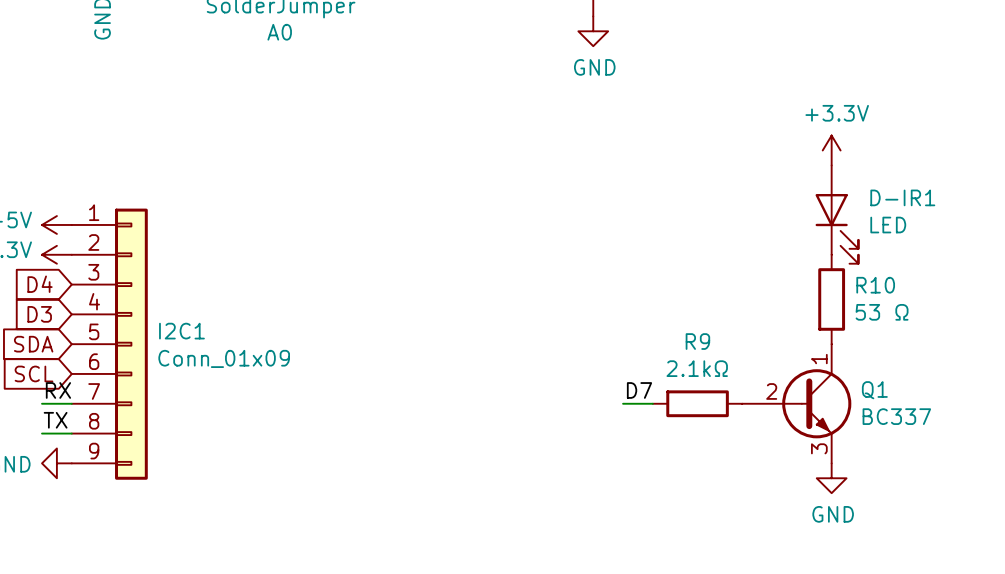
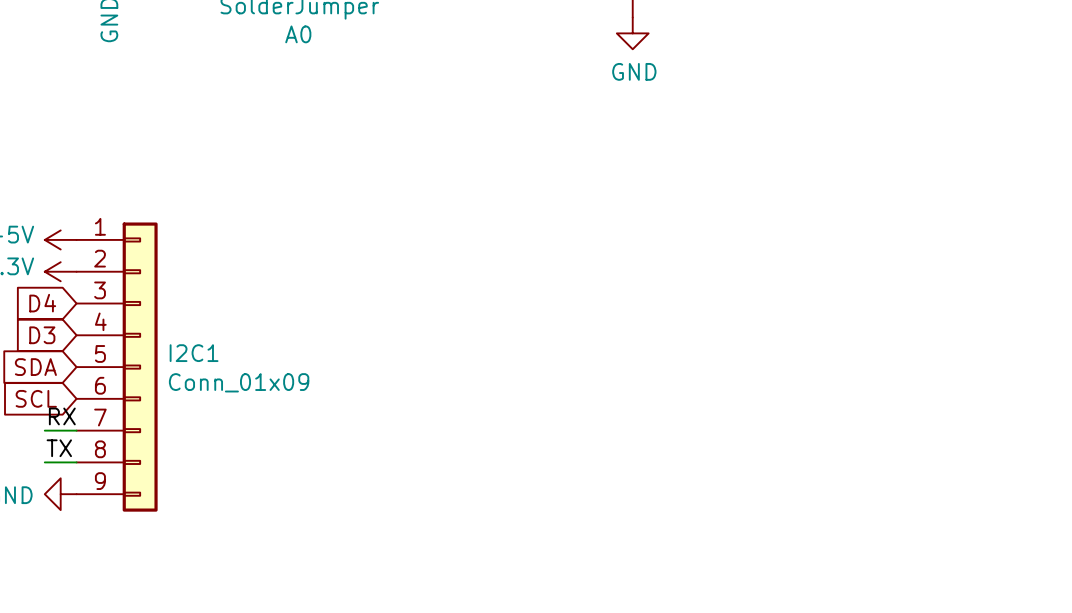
power symbol: +3.3V (831, 150) -> none
D-IR1: LED (837, 214) -> none
R10: 53 Ω (831, 299) -> none
label: D7 (639, 390) -> none
wire: (623, 403) (652, 403) -> none
R9: 2.1kΩ (697, 403) -> none
Q1: BC337 (796, 403) -> none
power symbol: GND (831, 478) -> none

